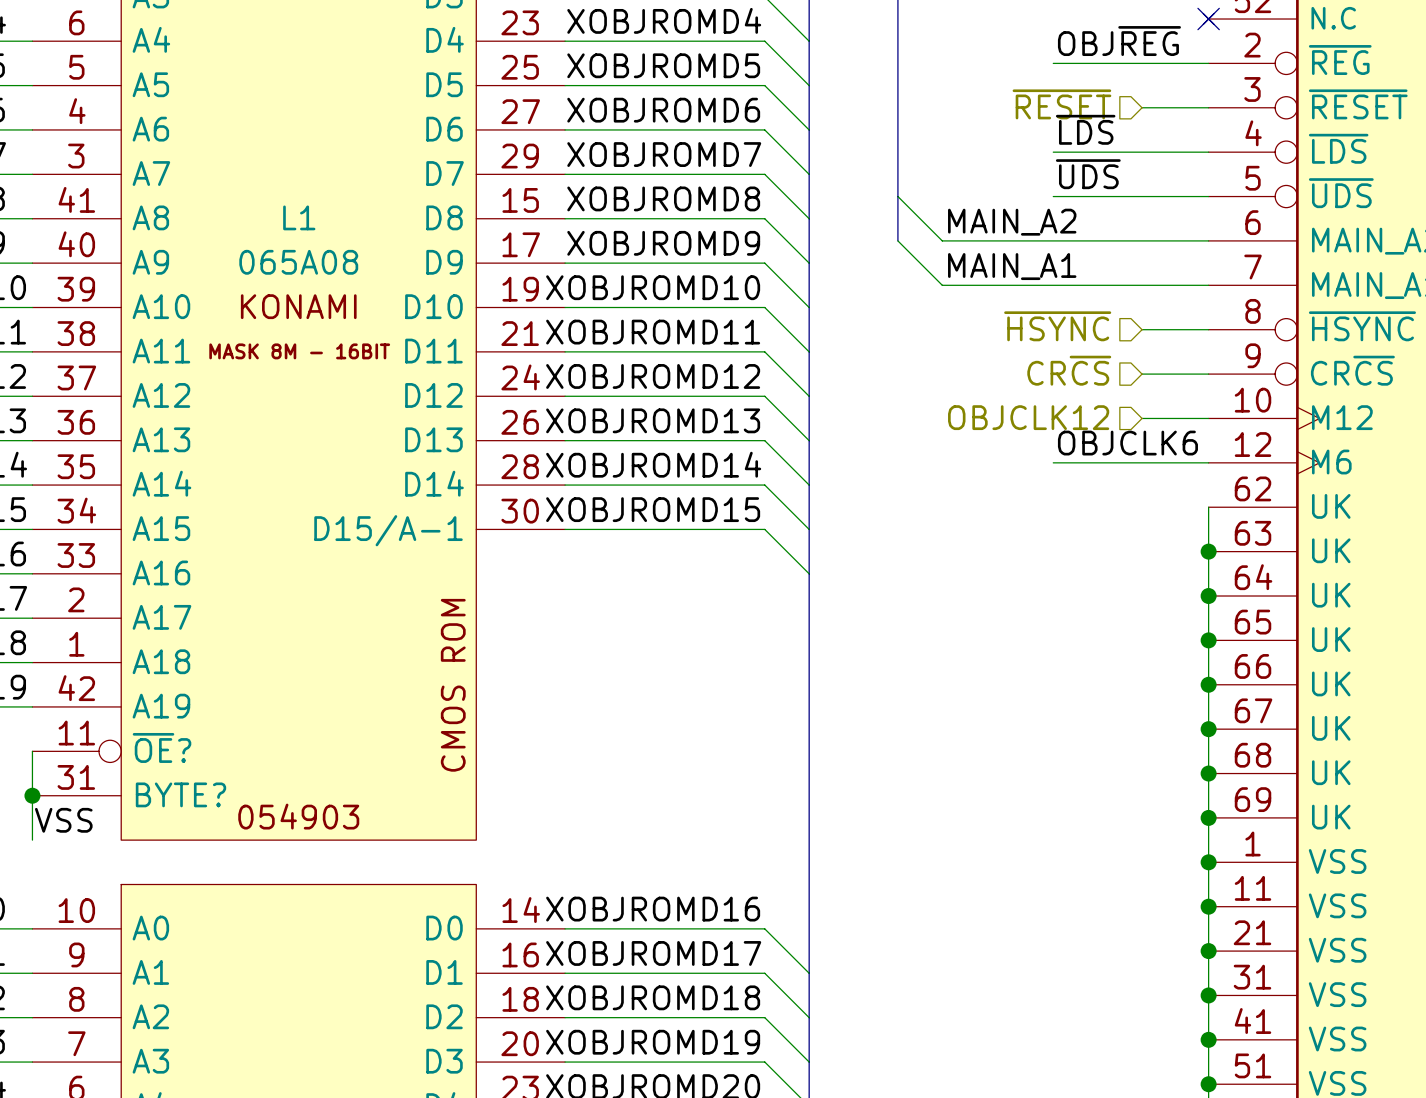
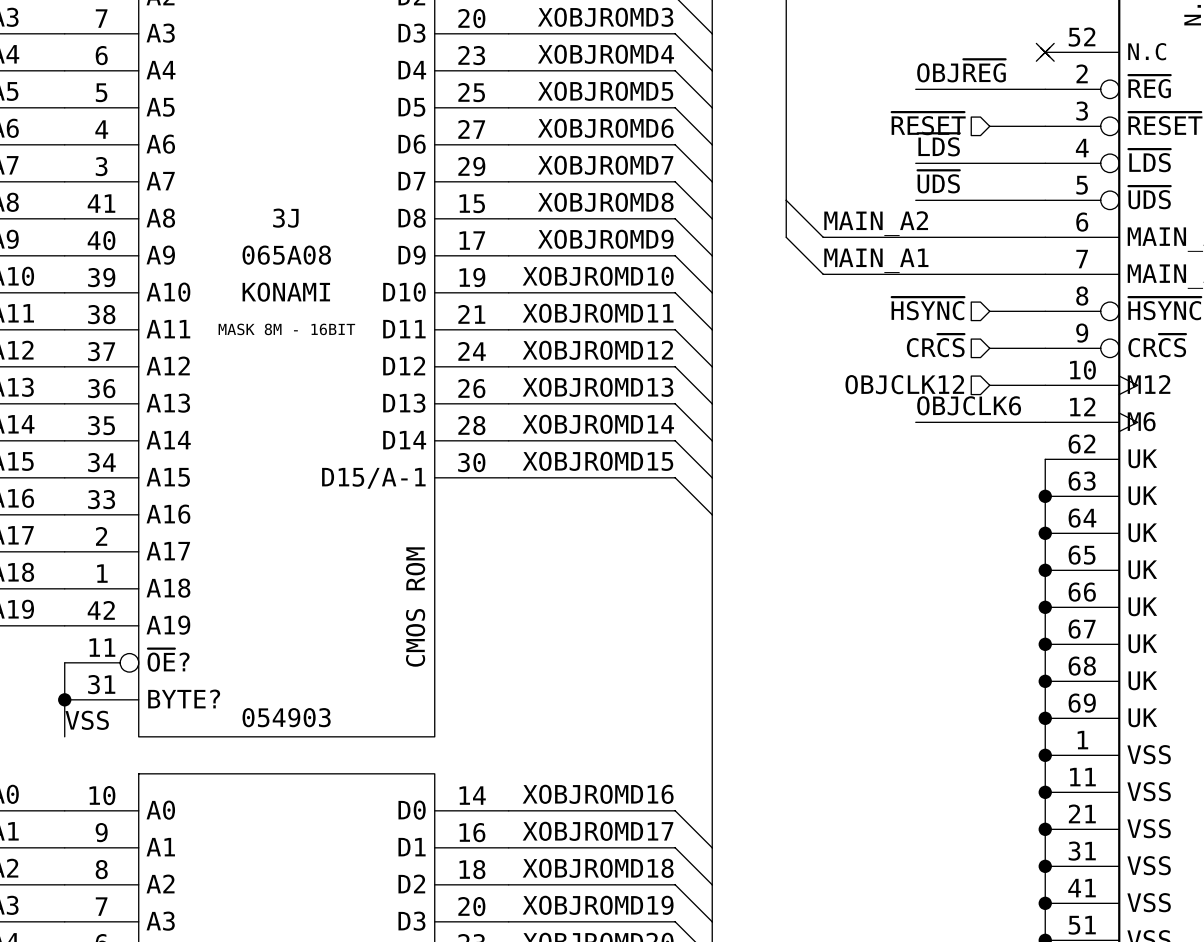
L1 name: L1 (299, 217) -> 3J (285, 218)

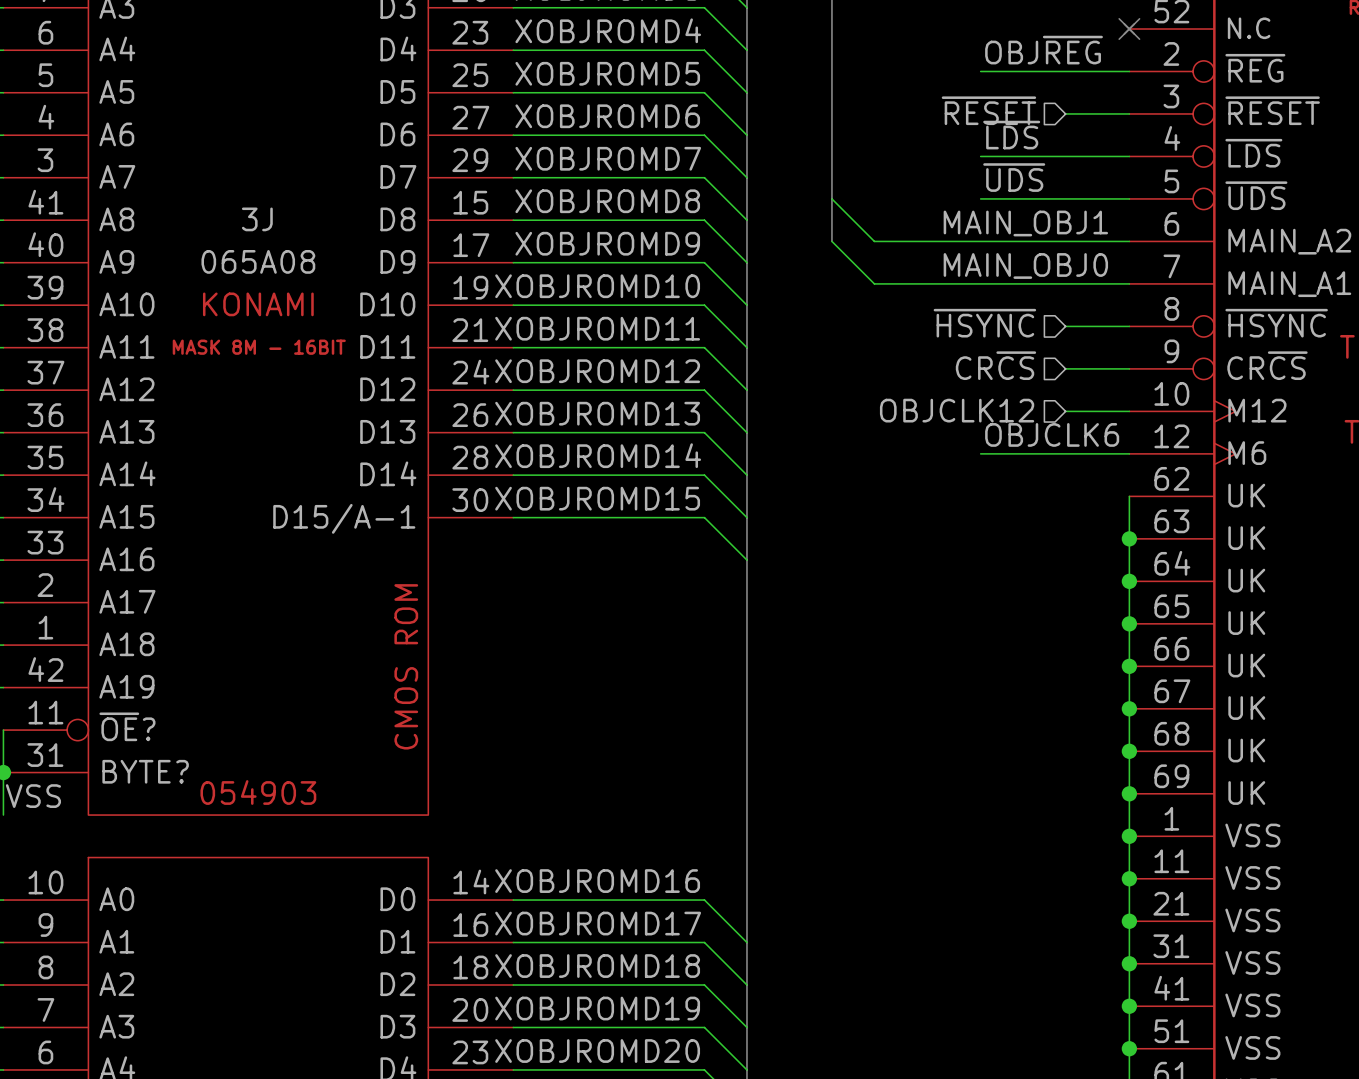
label: MAIN_A2 (876, 223) -> none
label: none -> MAIN_OBJ1 (1025, 223)
label: MAIN_A1 (876, 260) -> none
label: none -> MAIN_OBJ0 (1025, 265)

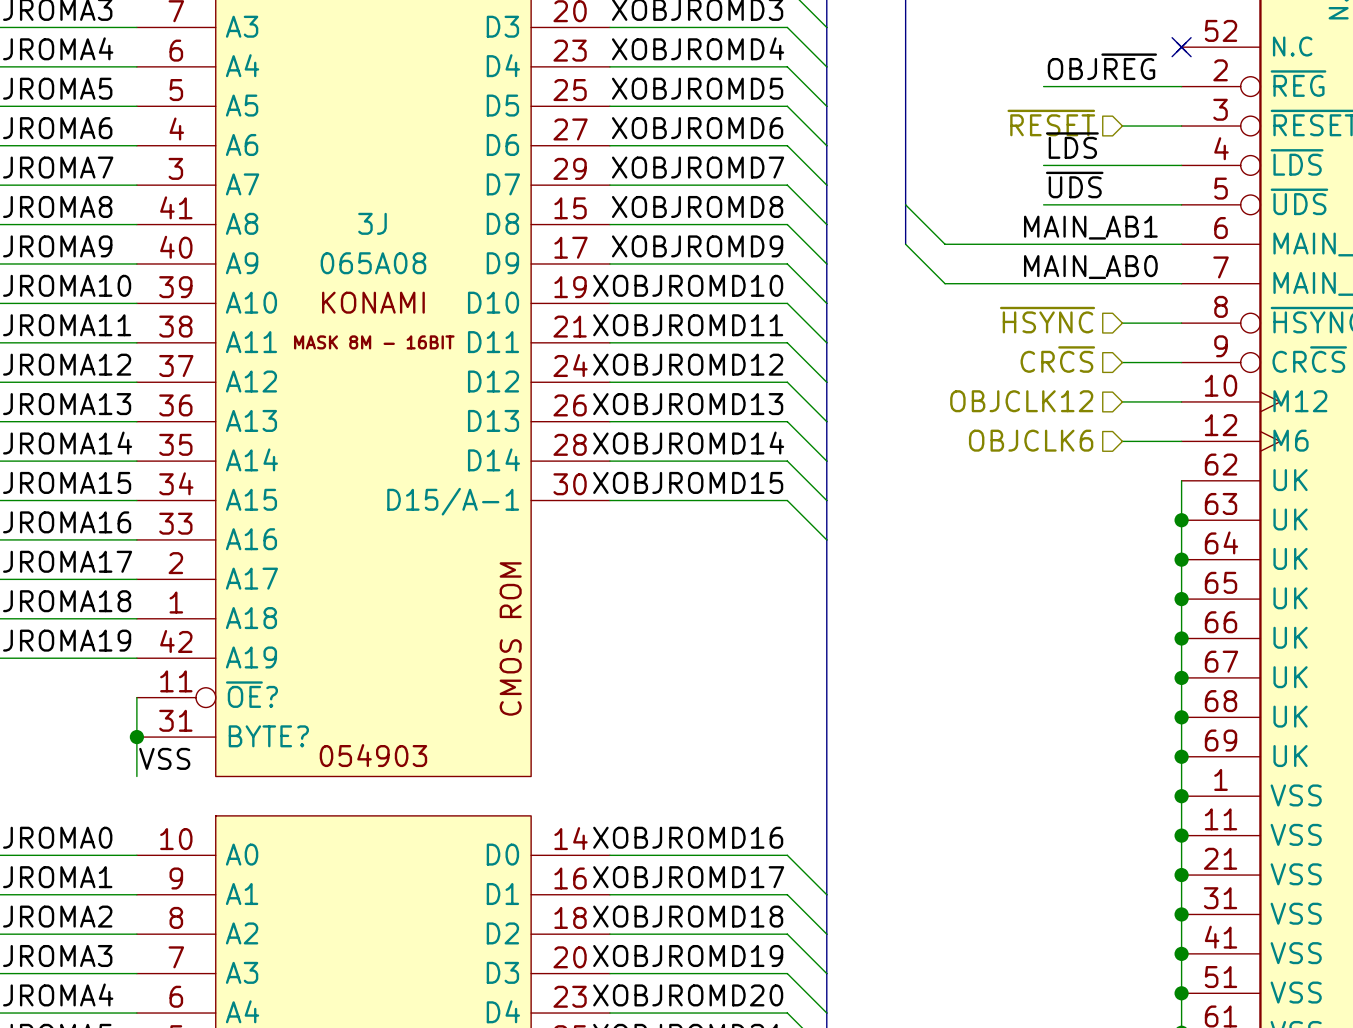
label: MAIN_OBJ1 (1025, 223) -> none
label: none -> MAIN_AB1 (1090, 227)
label: MAIN_OBJ0 (1025, 265) -> none
label: none -> MAIN_AB0 (1090, 267)
label: OBJCLK6 (1052, 434) -> none
hierarchical label: none -> OBJCLK6 (1031, 440)
wire: (980, 453) (1065, 453) -> none

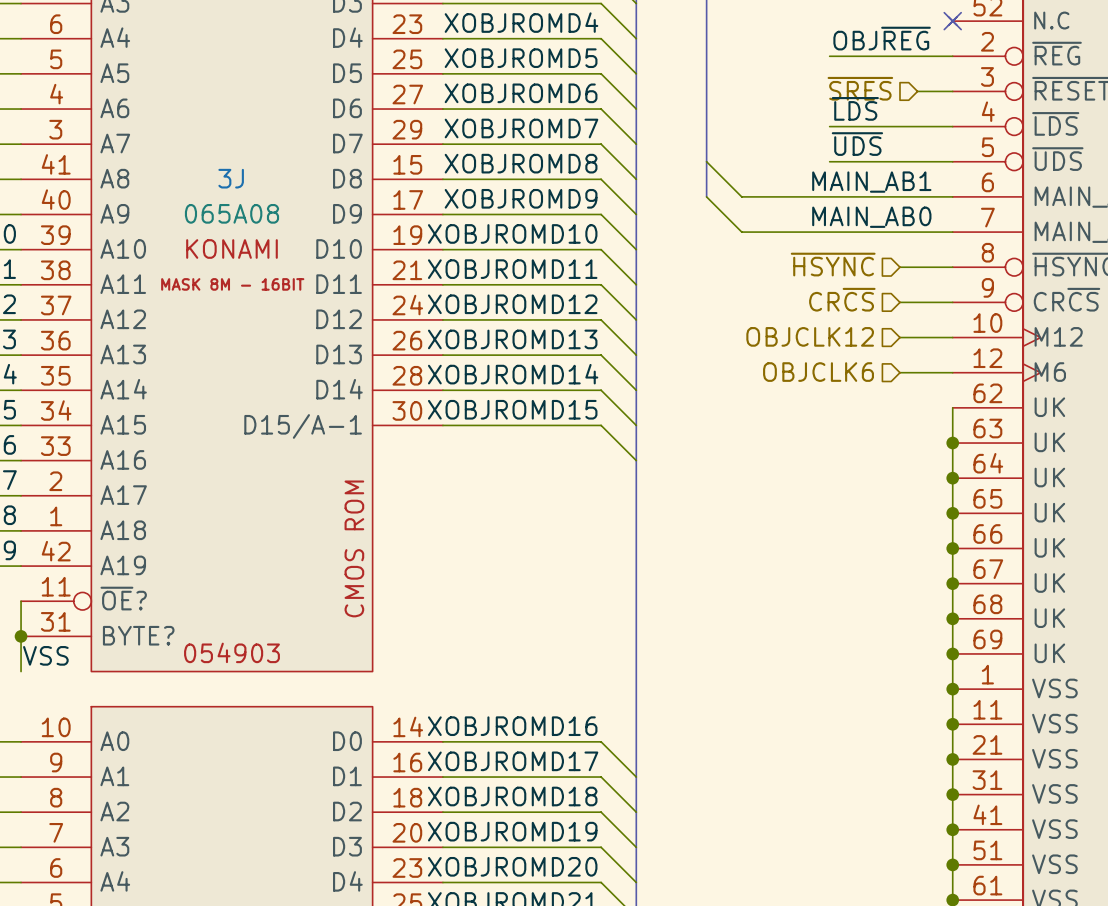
hierarchical label: ~{RESET} (1051, 123) -> ~{SRES} (860, 88)
wire: (1122, 126) (1142, 126) -> none

